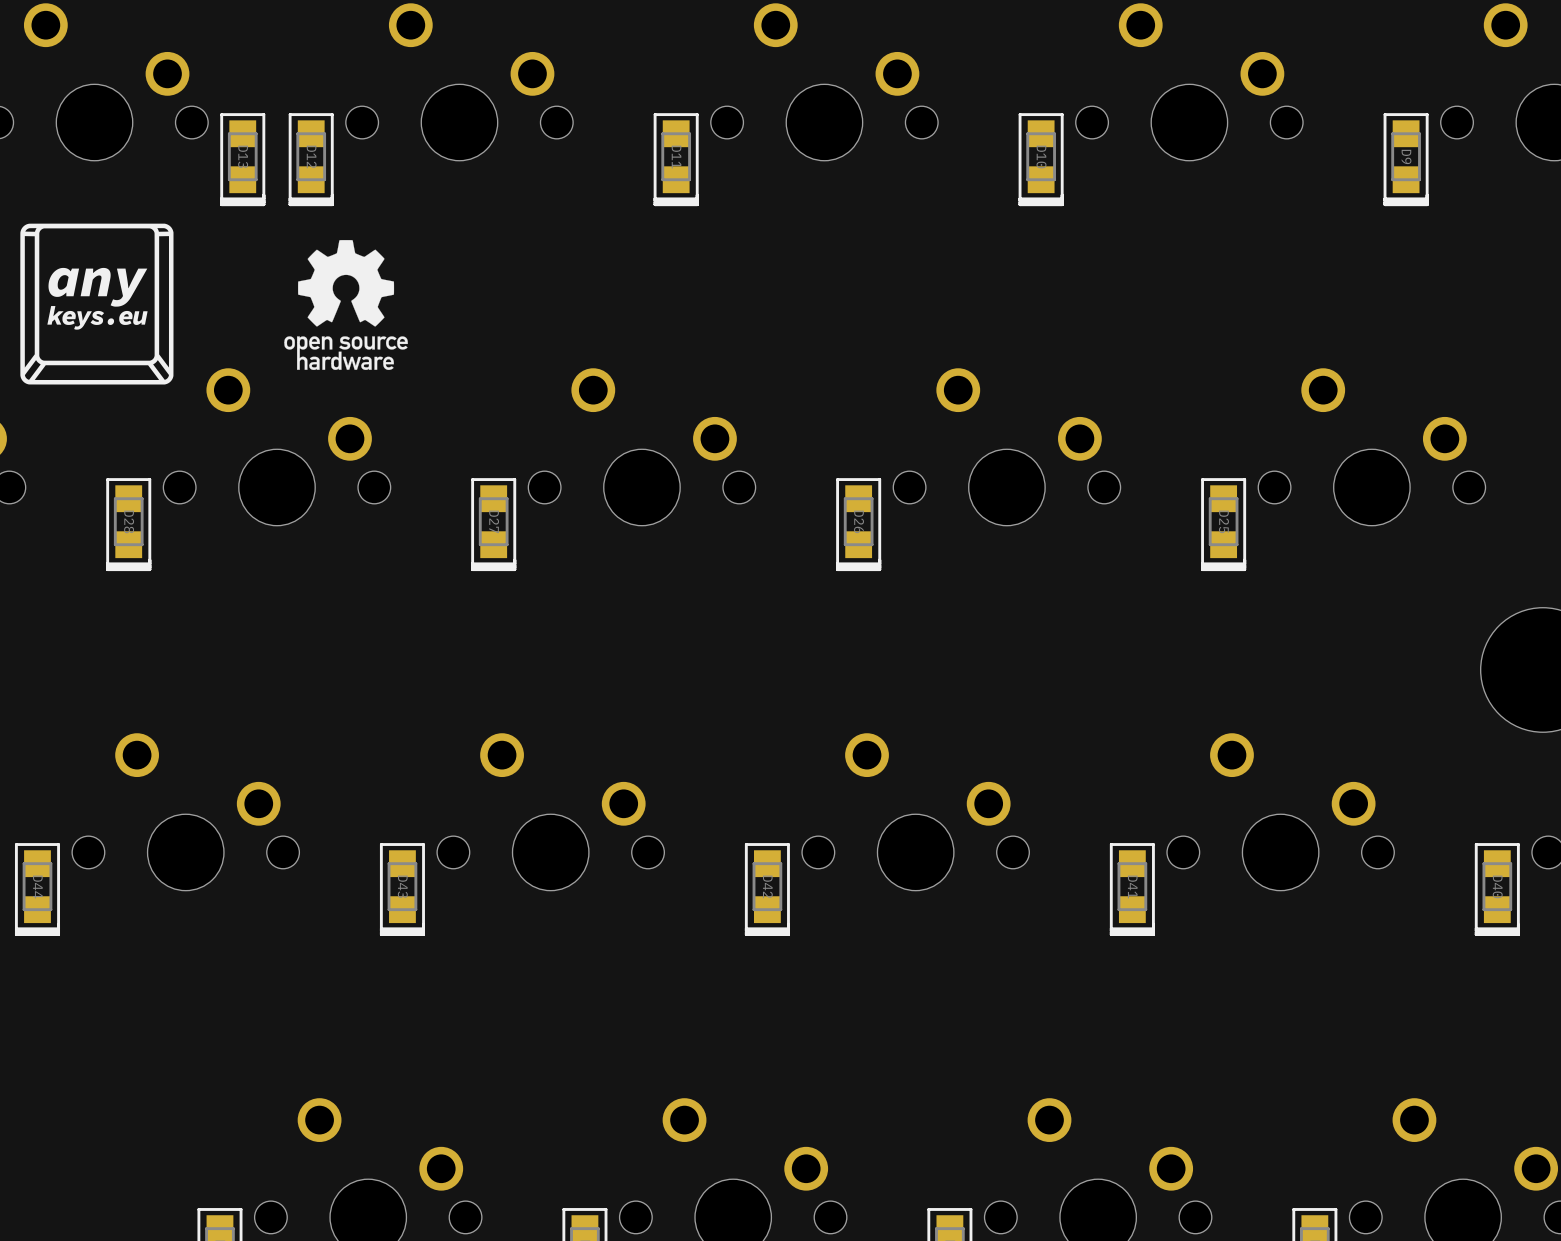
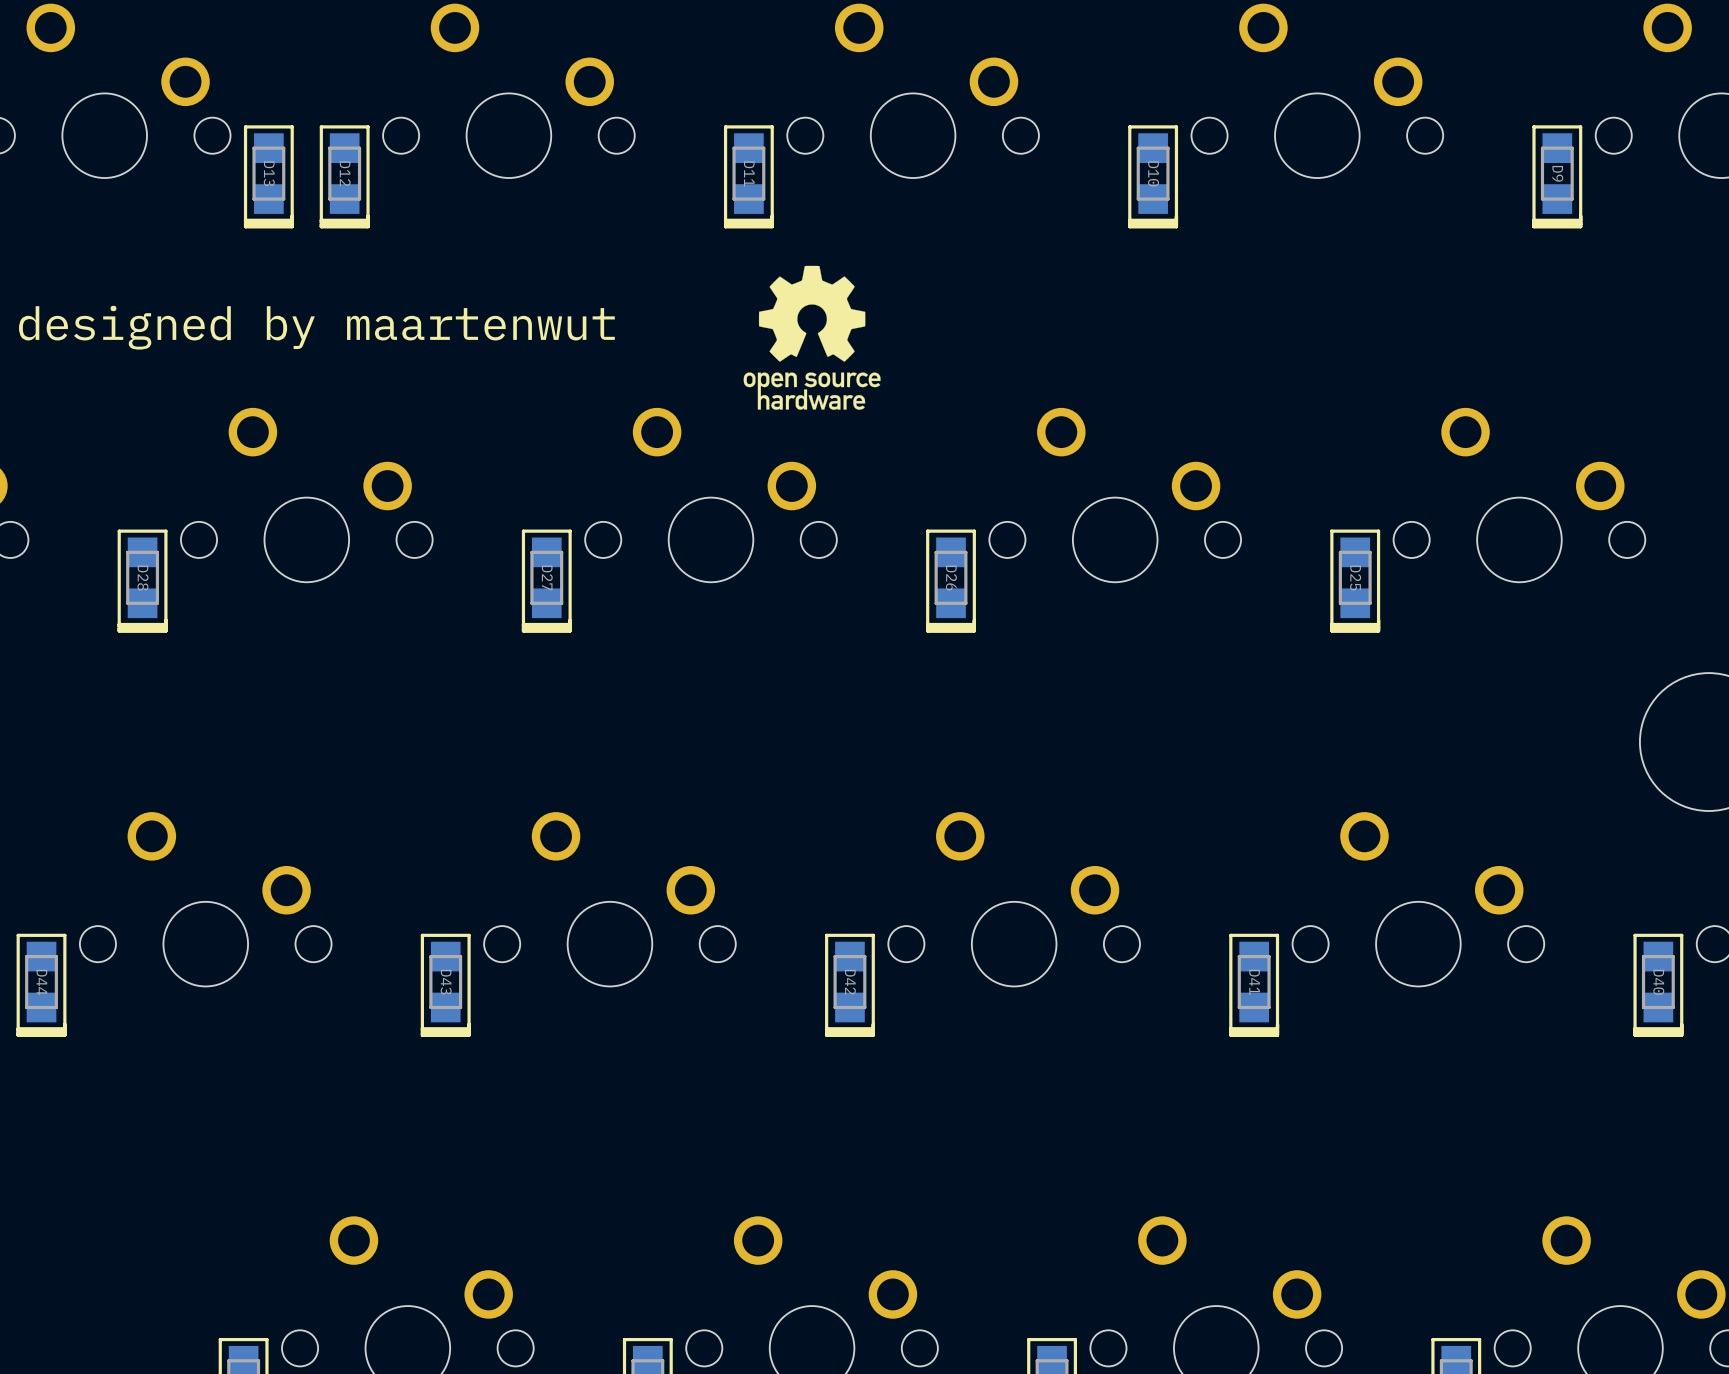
drawing: [20, 223, 174, 385] -> none
text: none -> designed by maartenwut (316, 327)
drawing position: (346, 305) -> (812, 337)

